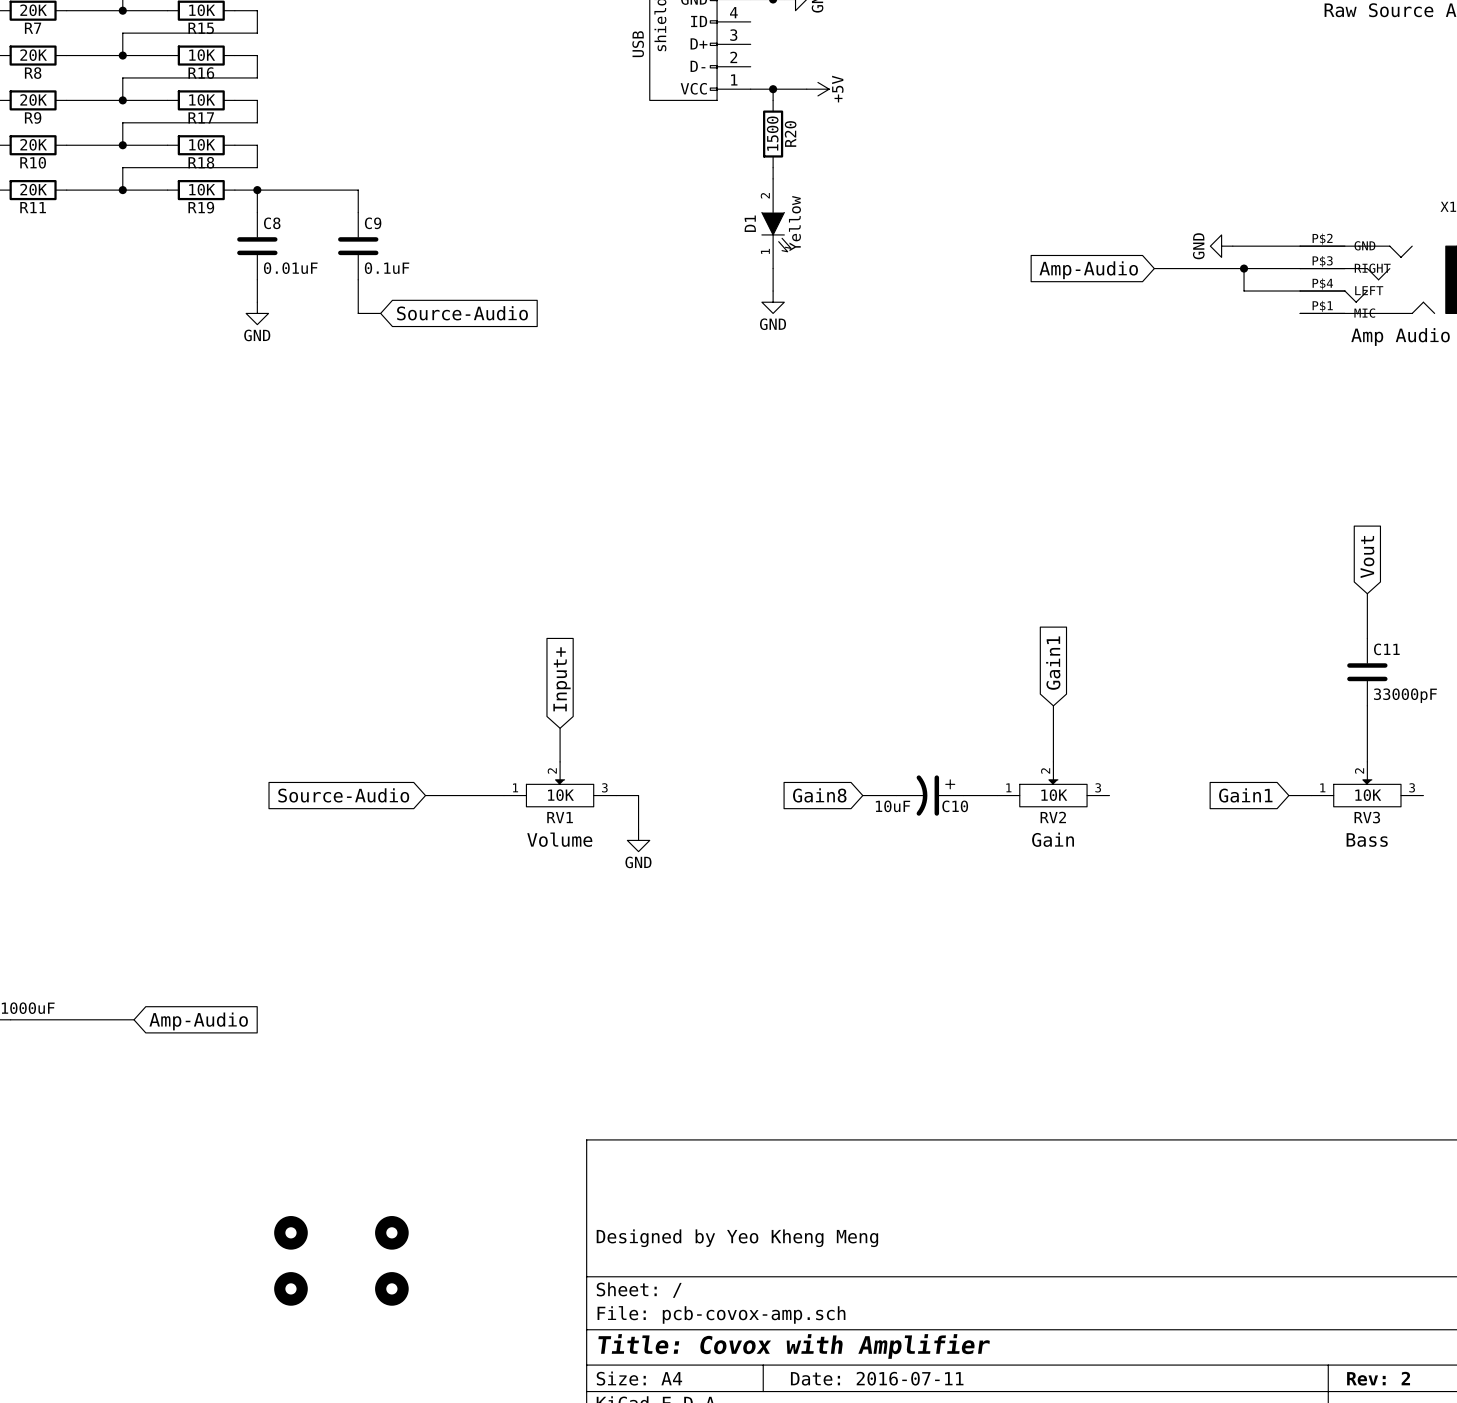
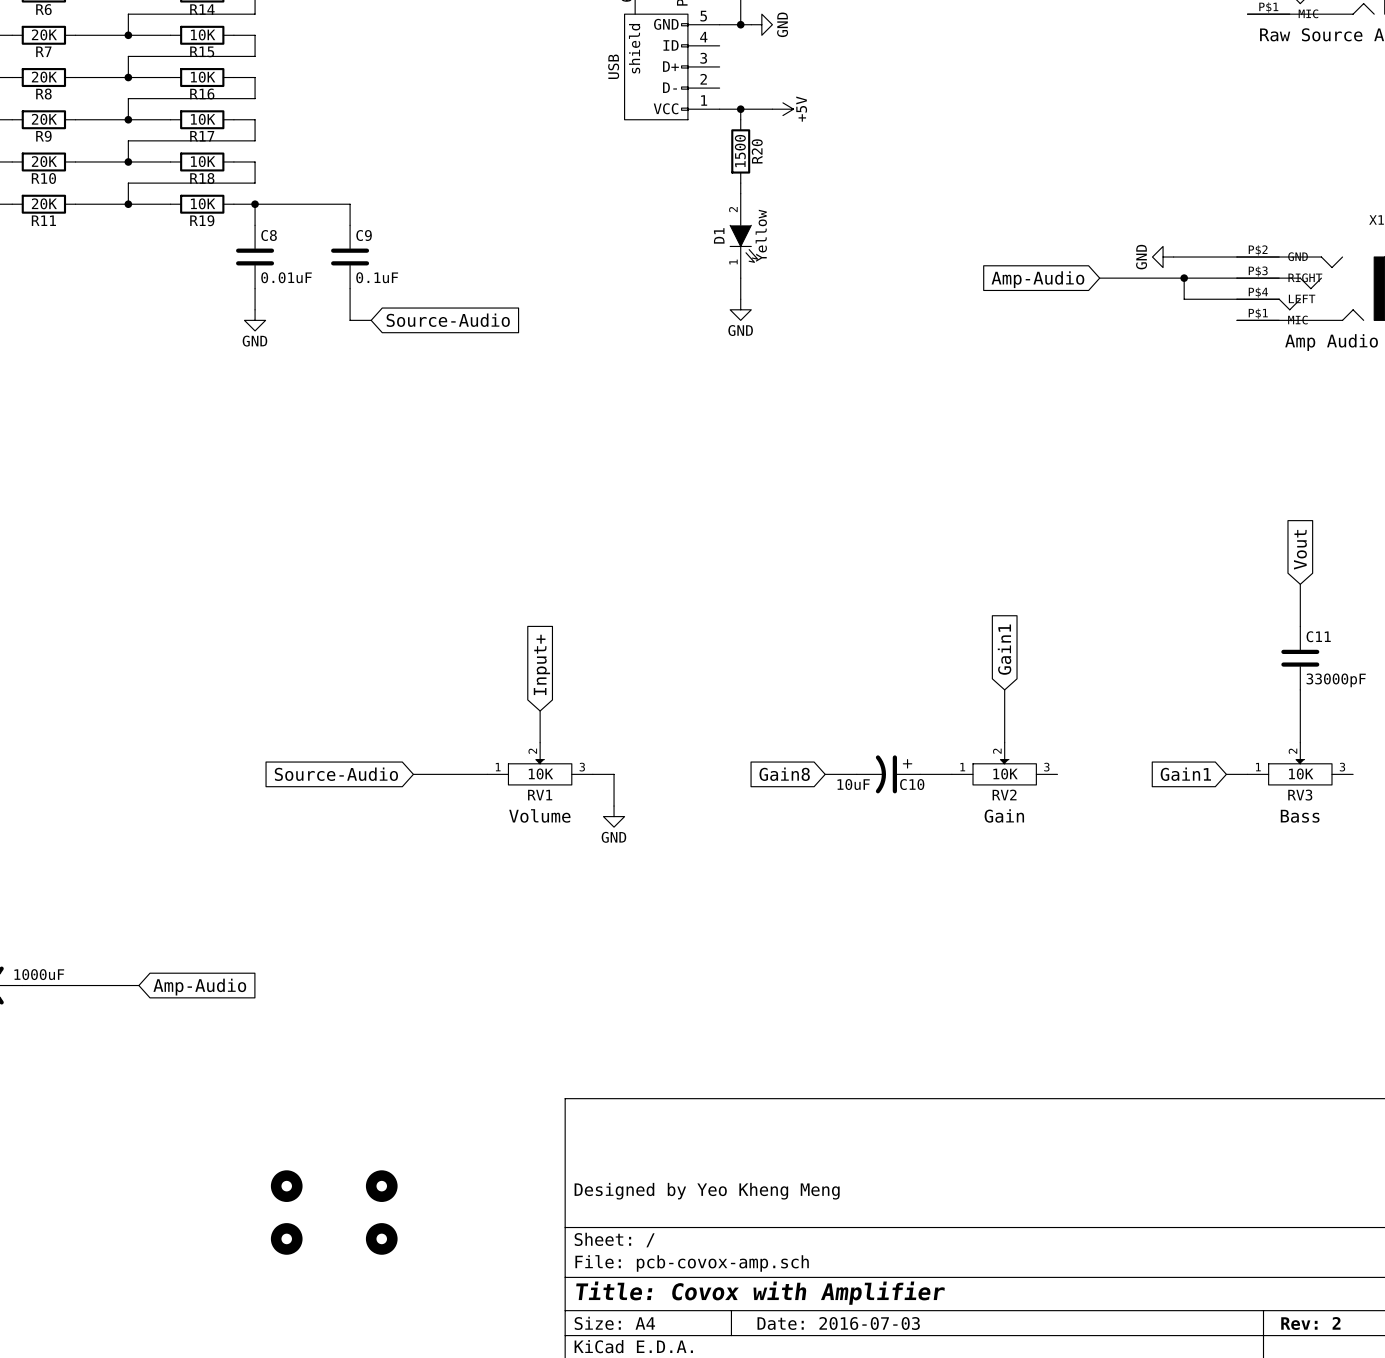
title block: Date: 2016-07-11 (877, 1378) -> Date: 2016-07-03 (838, 1323)

